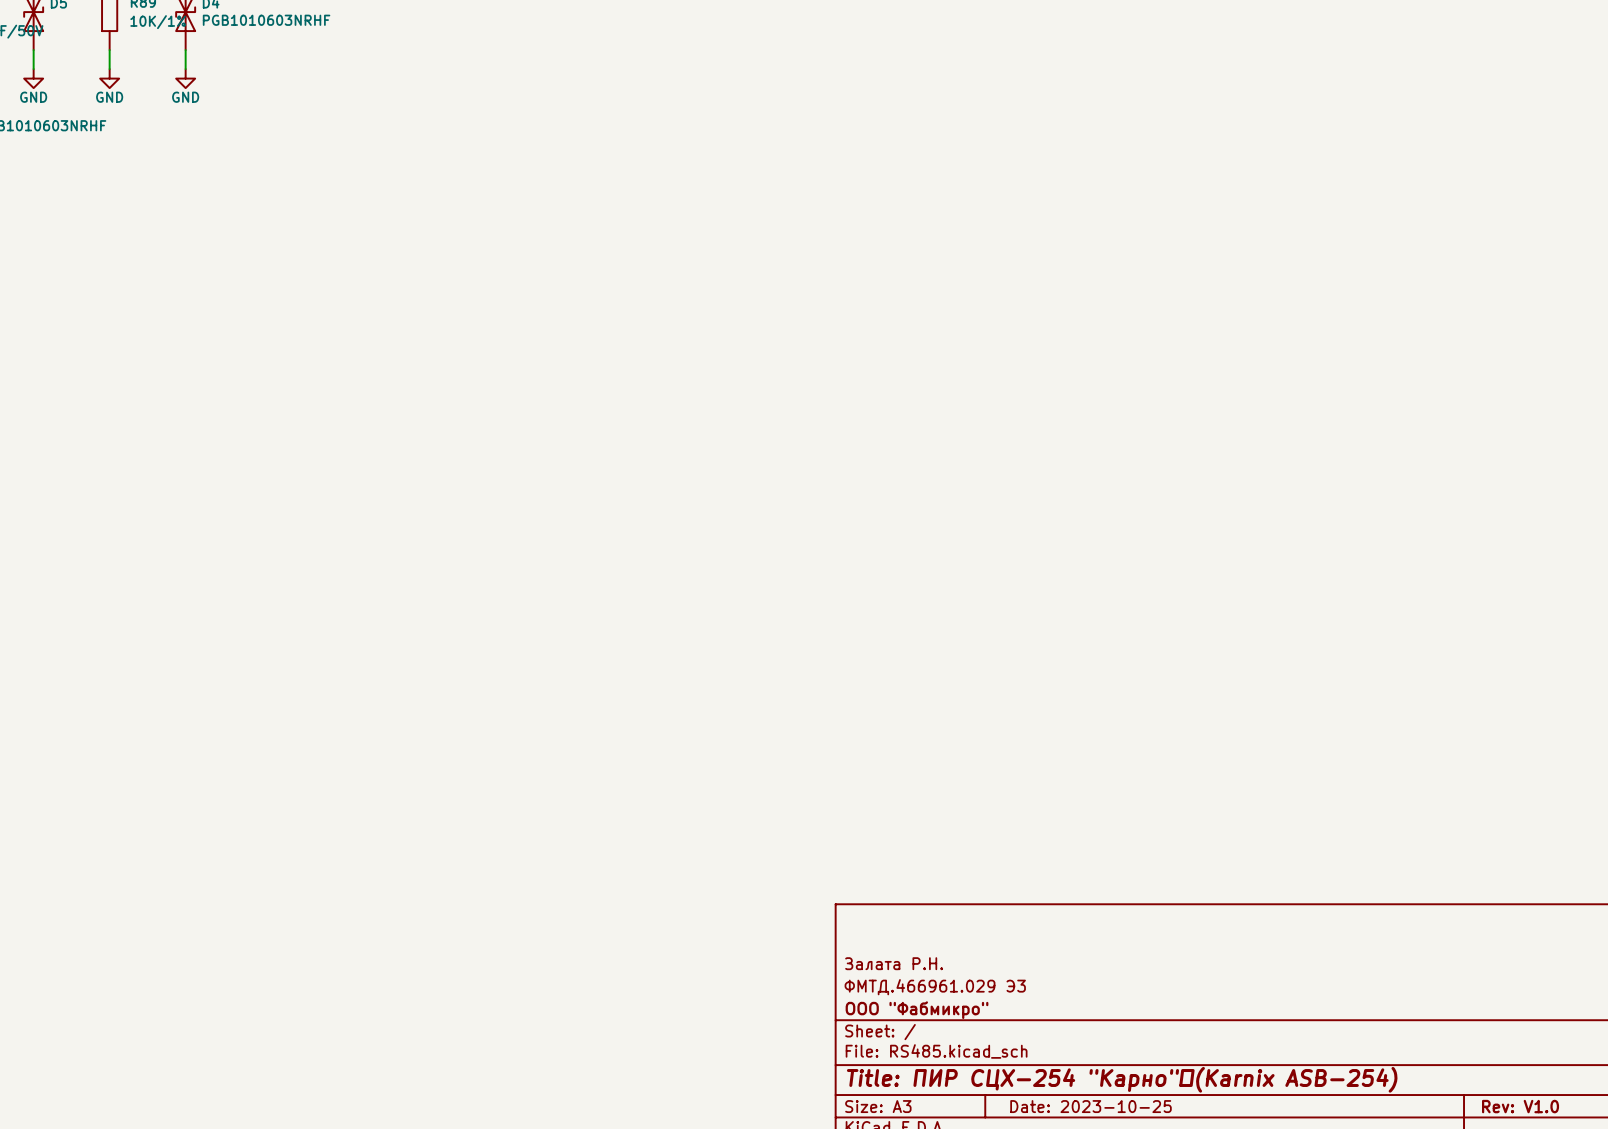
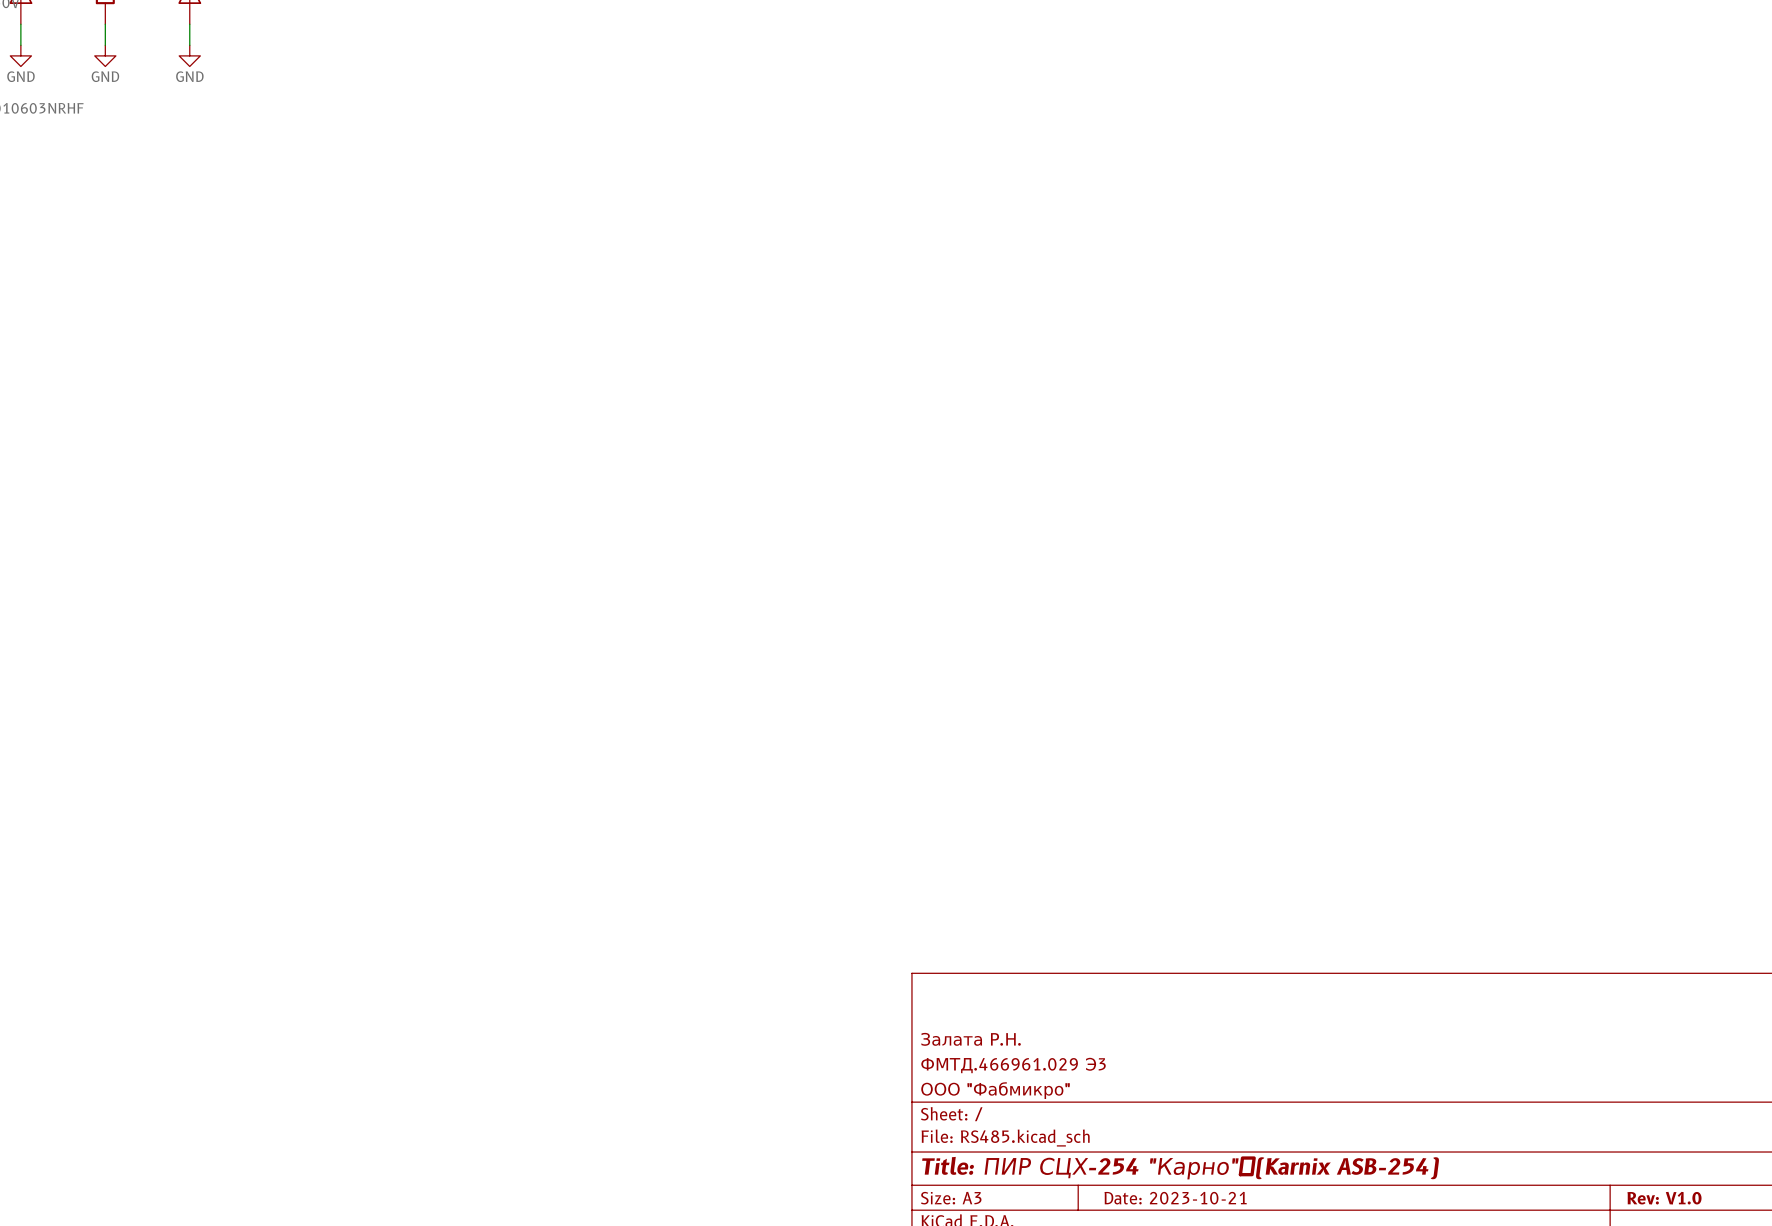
title block: Date: 2023-10-25 (1091, 1106) -> Date: 2023-10-21 (1175, 1198)

